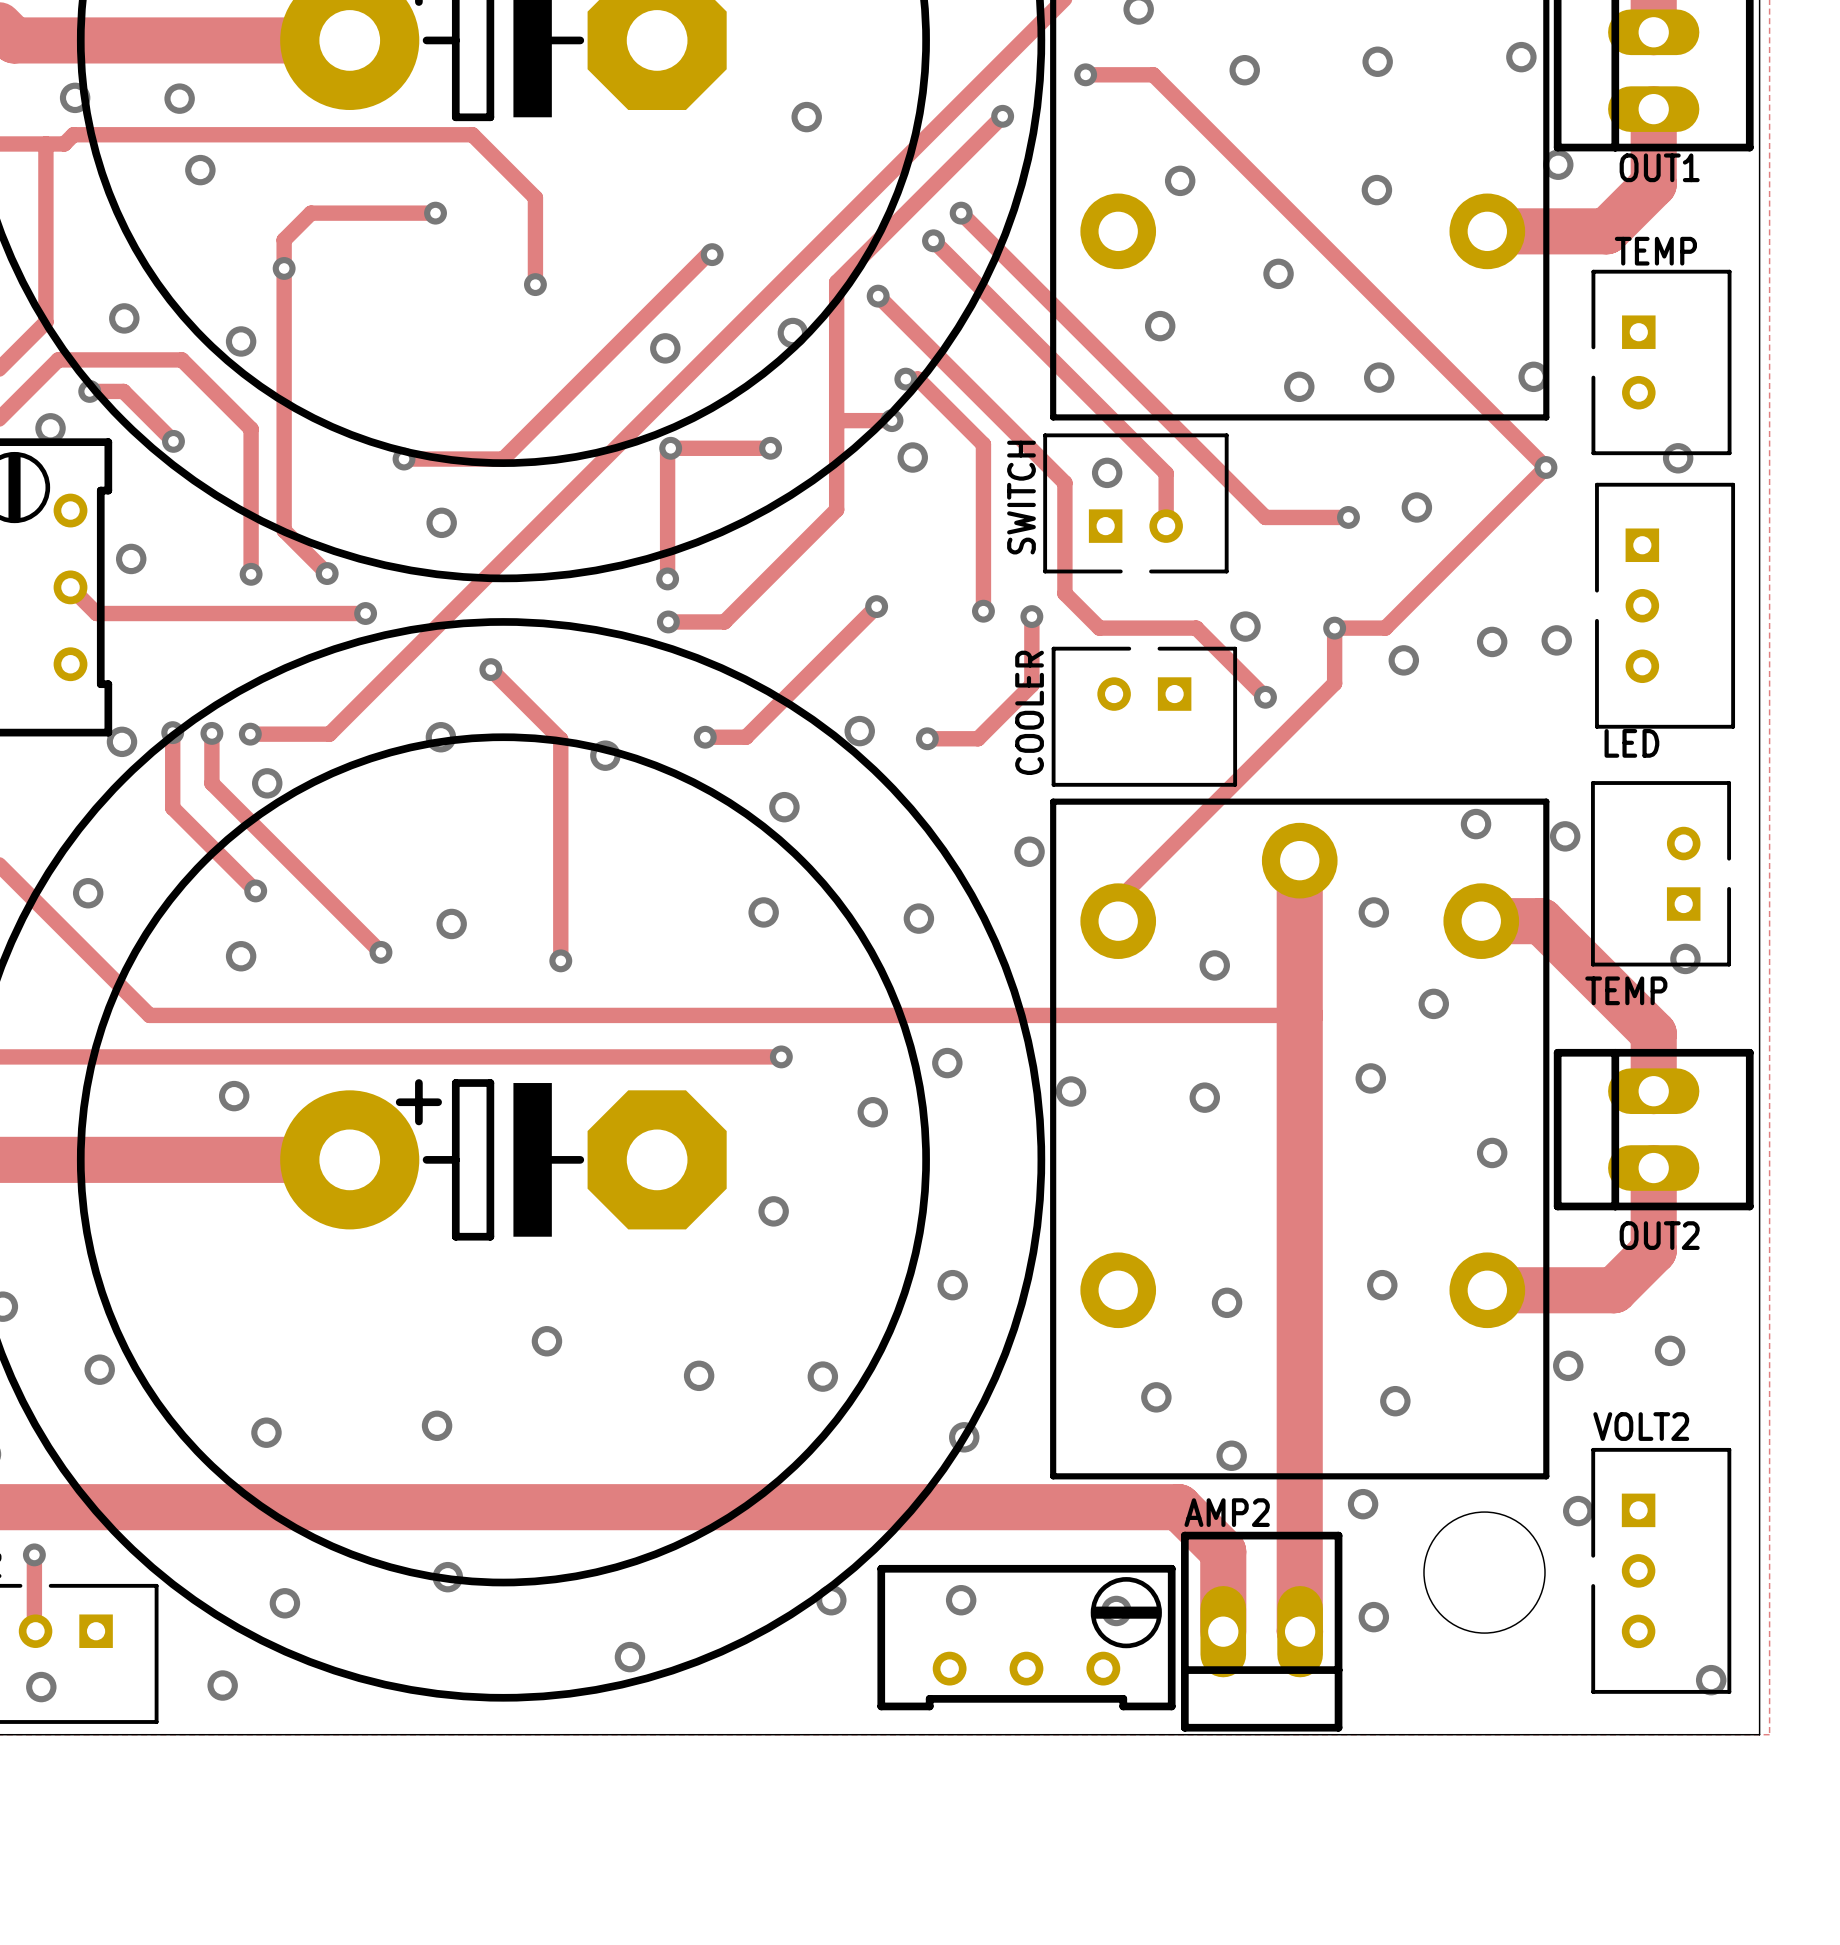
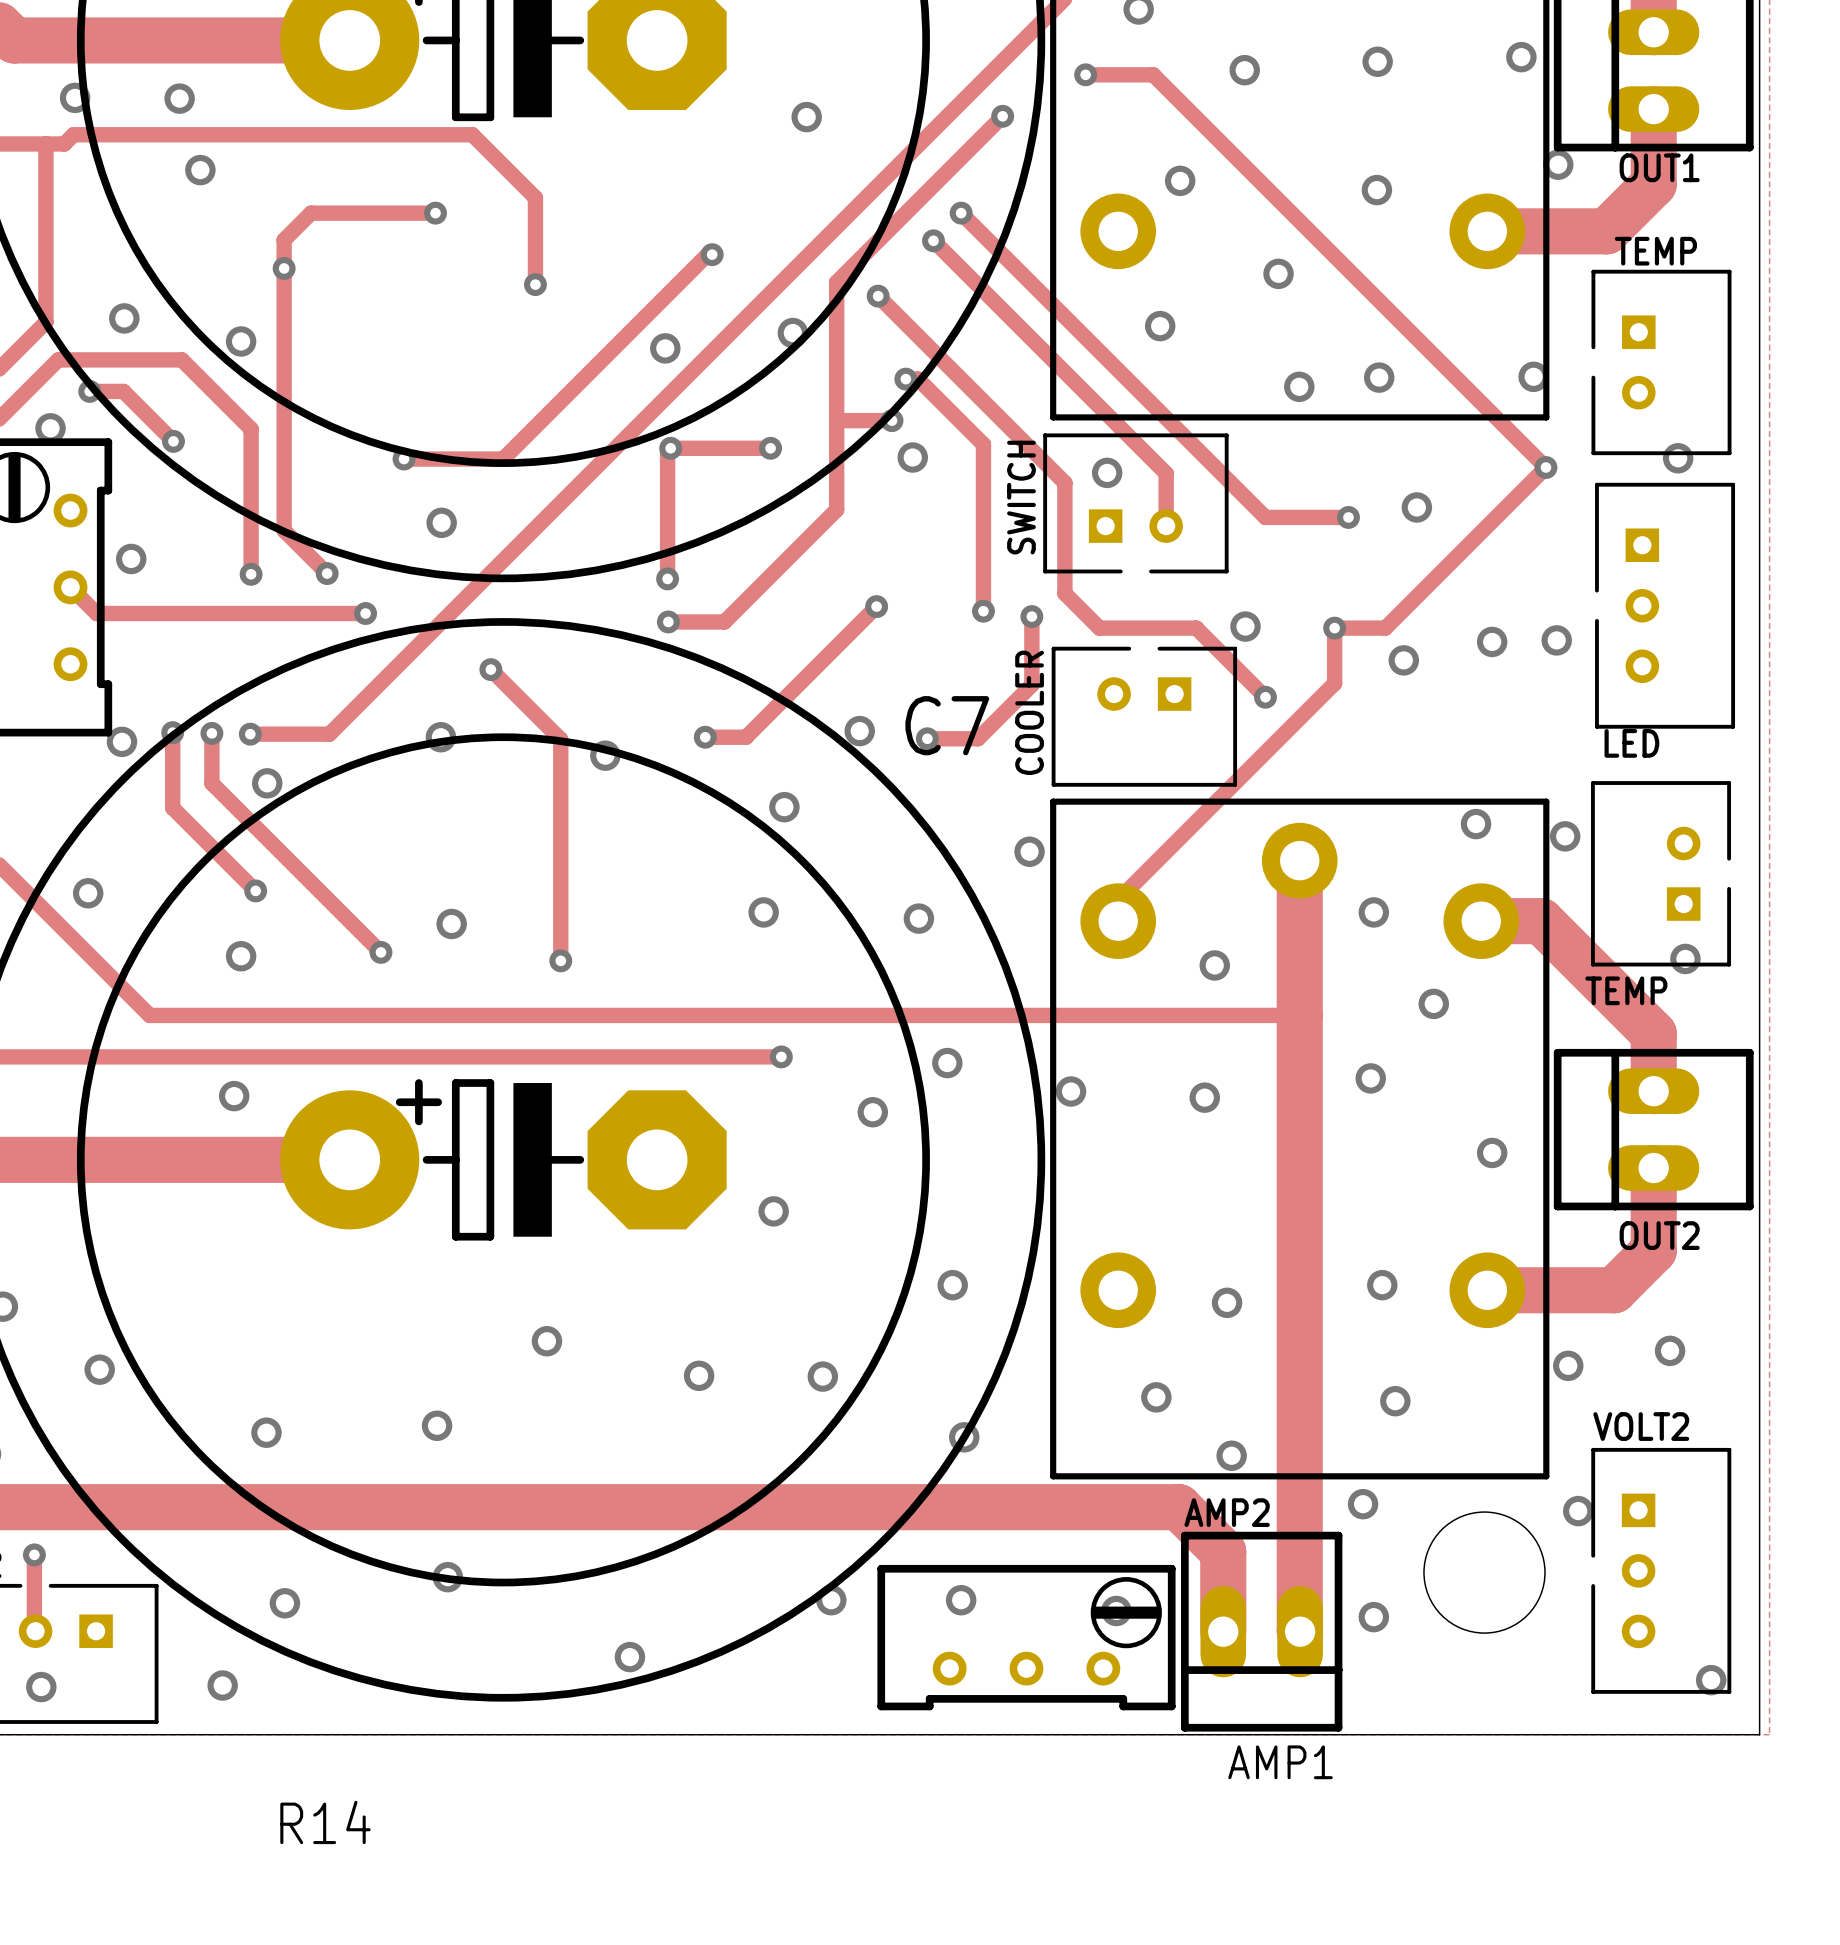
C7 name: none -> C7 (947, 725)
AMP1 name: none -> AMP1 (1280, 1762)
R14 name: none -> R14 (325, 1822)

